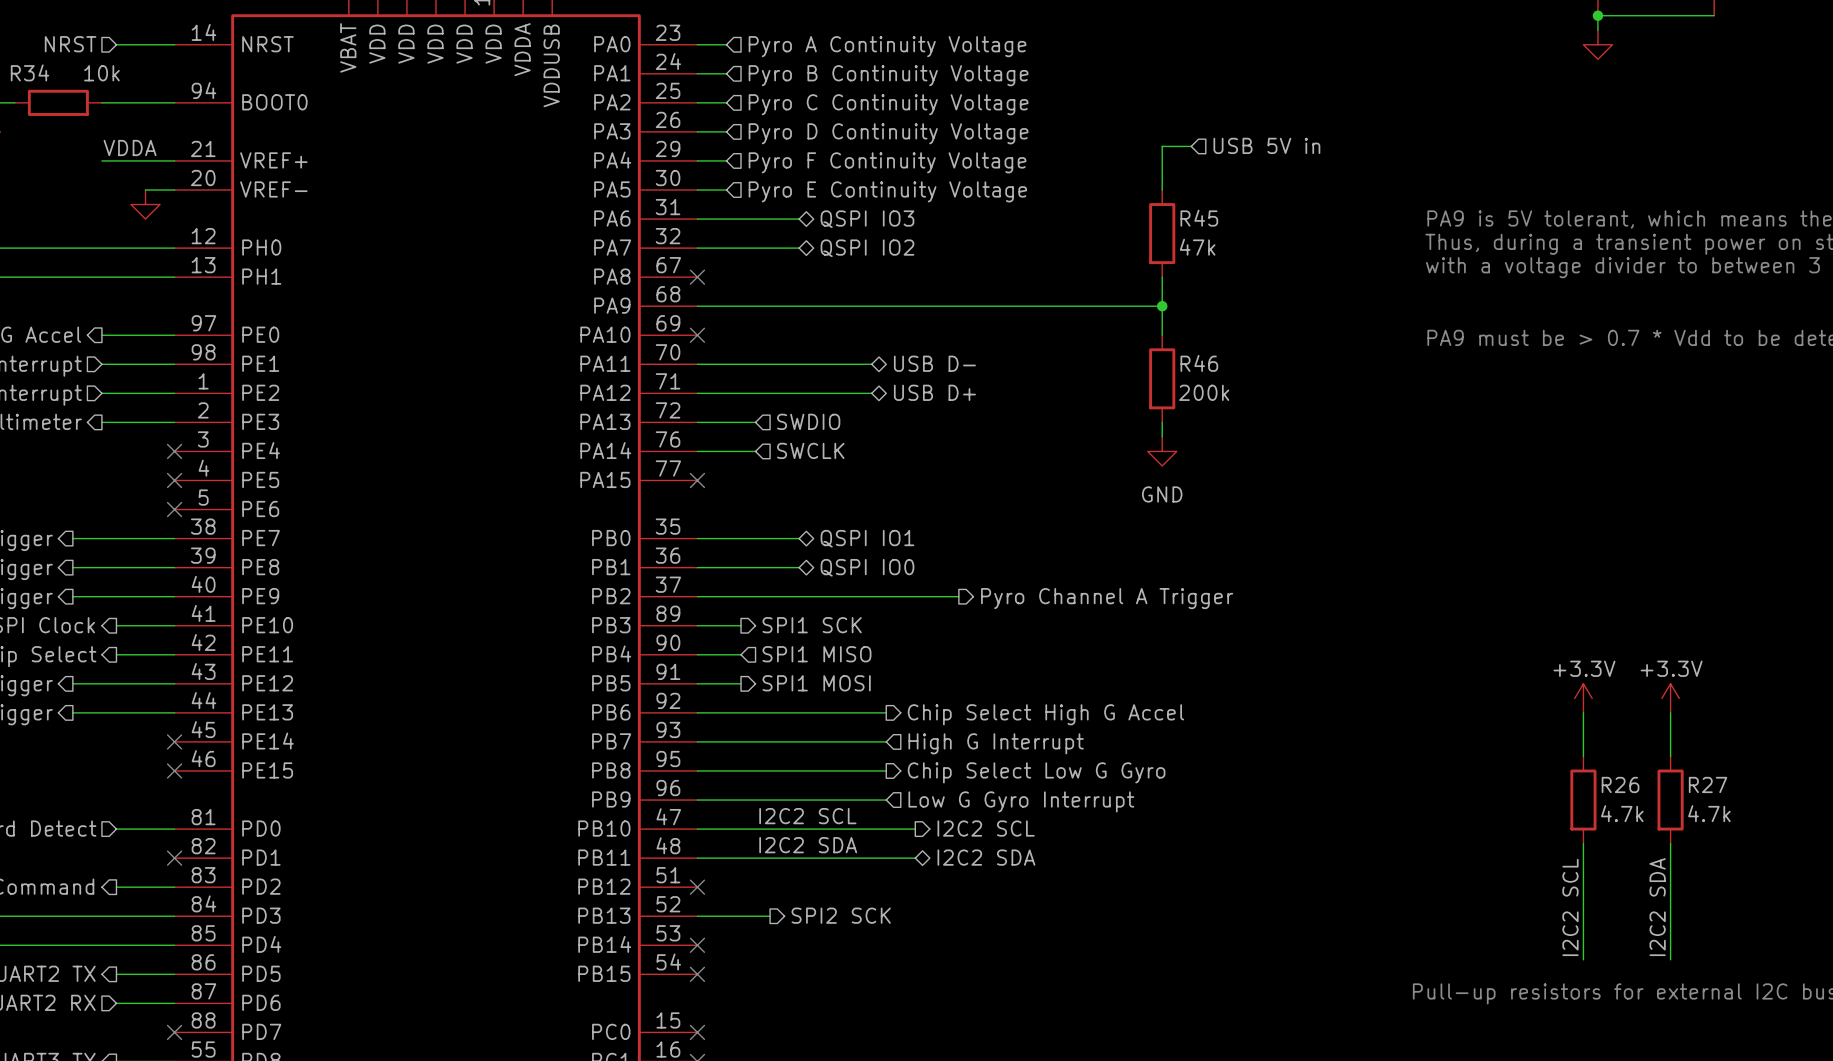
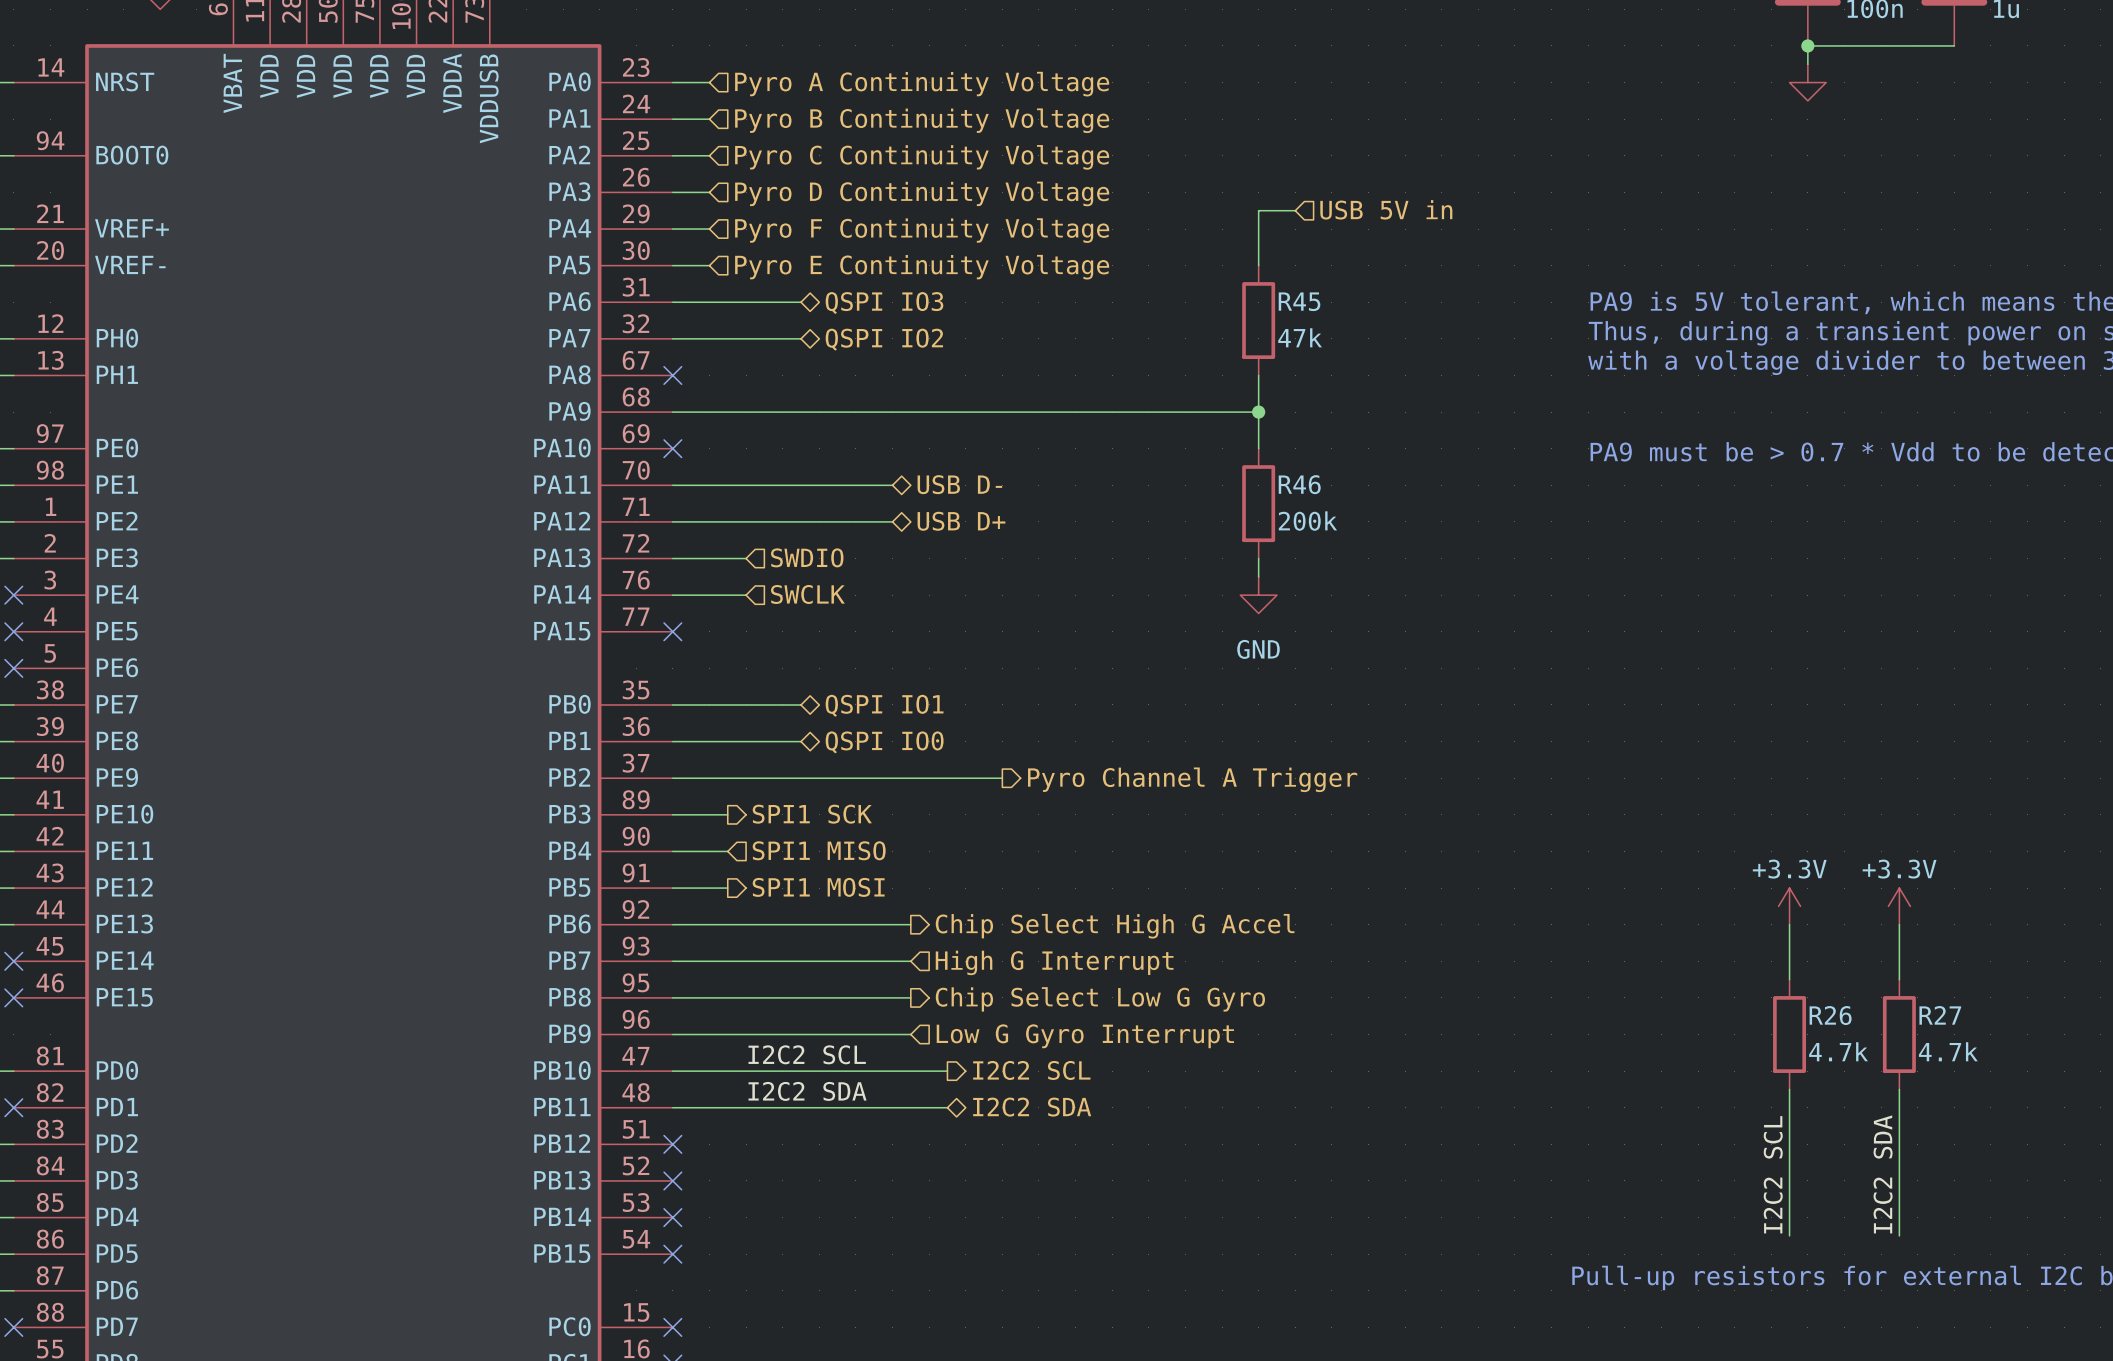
hierarchical label: SPI2 SCK (841, 915) -> none
wire: (697, 916) (770, 916) -> none
no-connect mark: none -> (672, 1180)

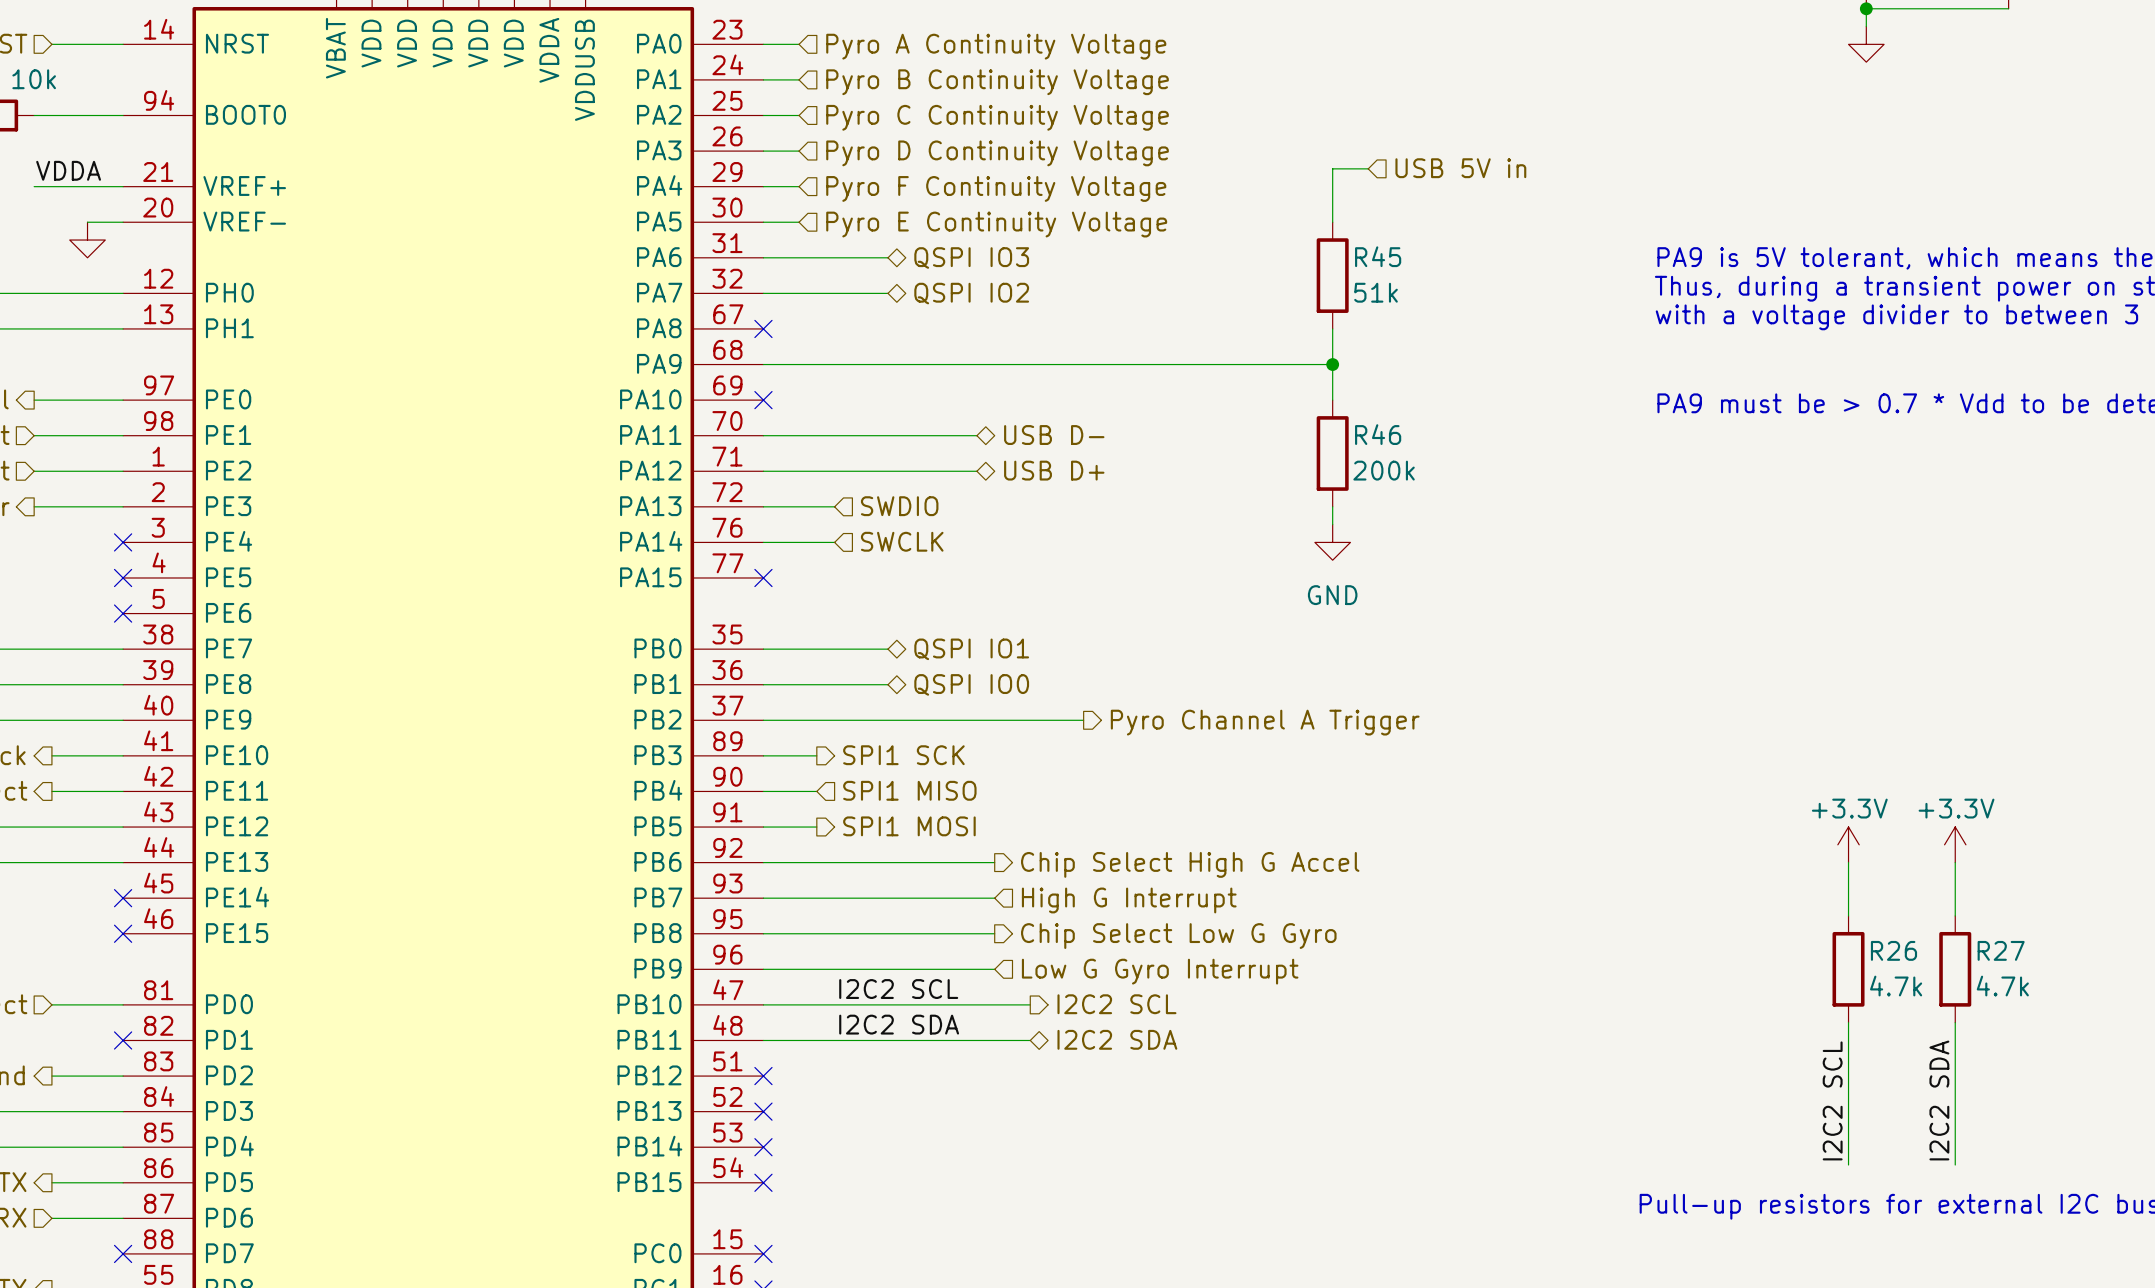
R45 value: 47k (1300, 337) -> 51k (1376, 292)

